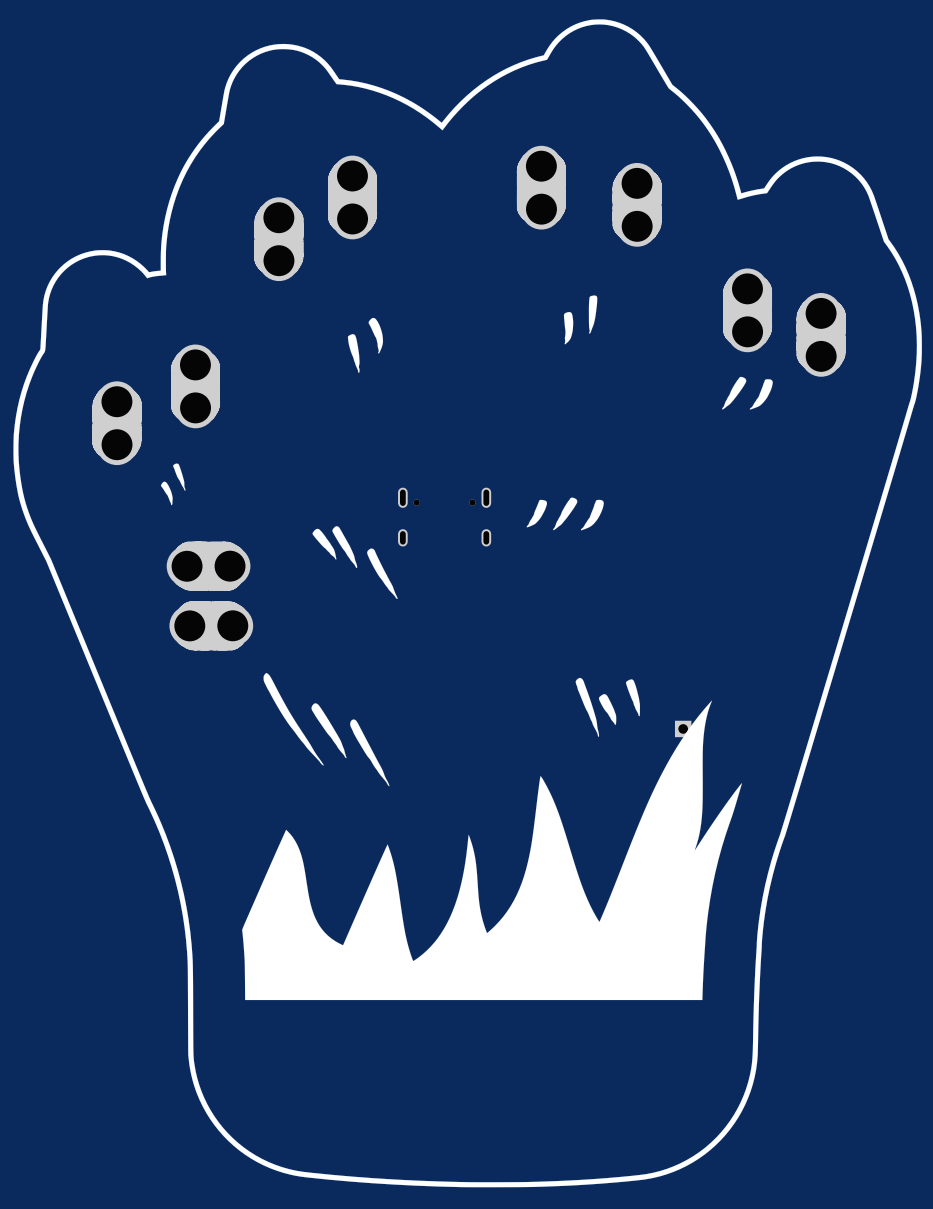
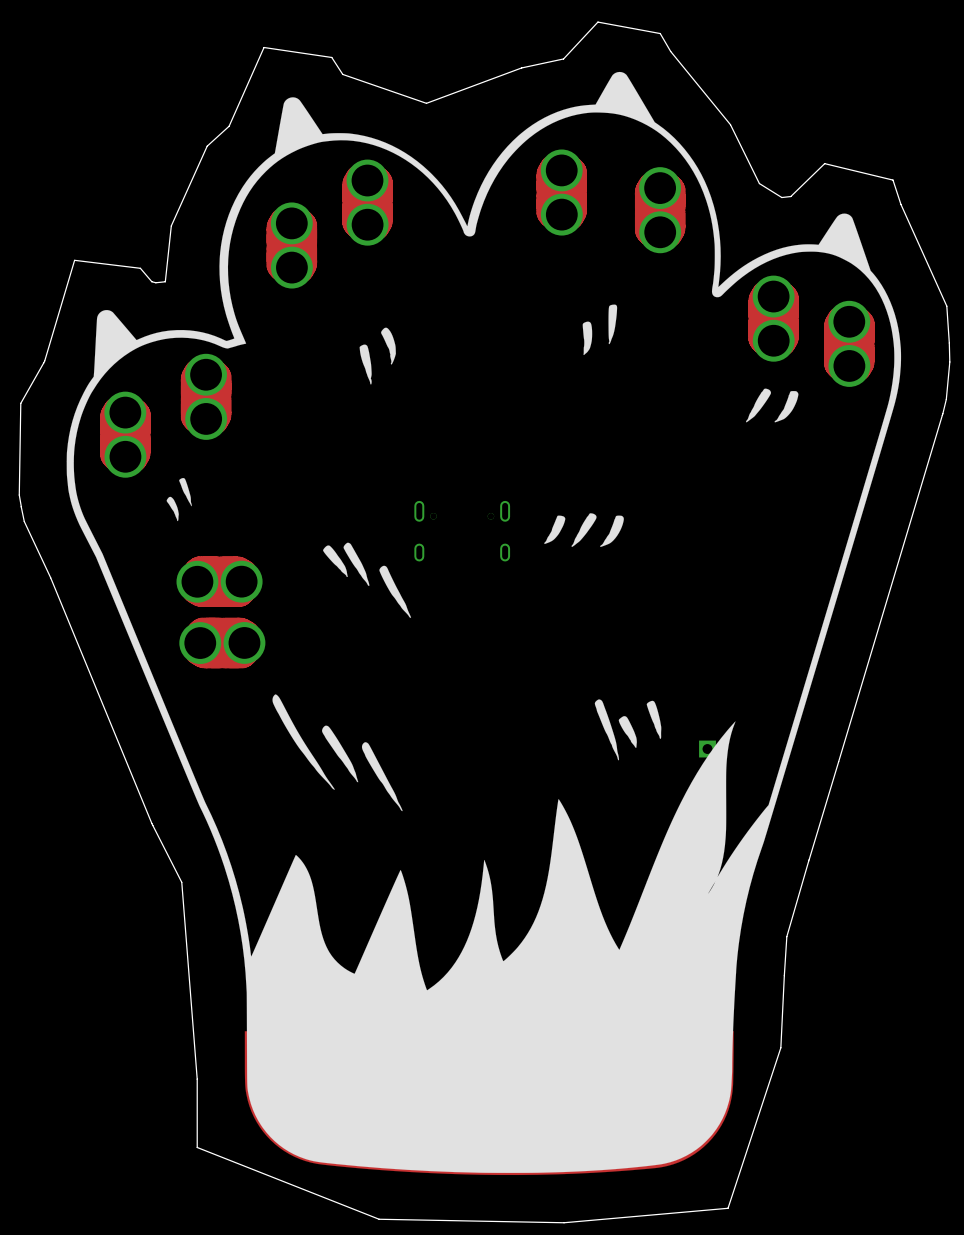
drawing shape: [13, 19, 922, 1188] -> [18, 21, 951, 1224]

